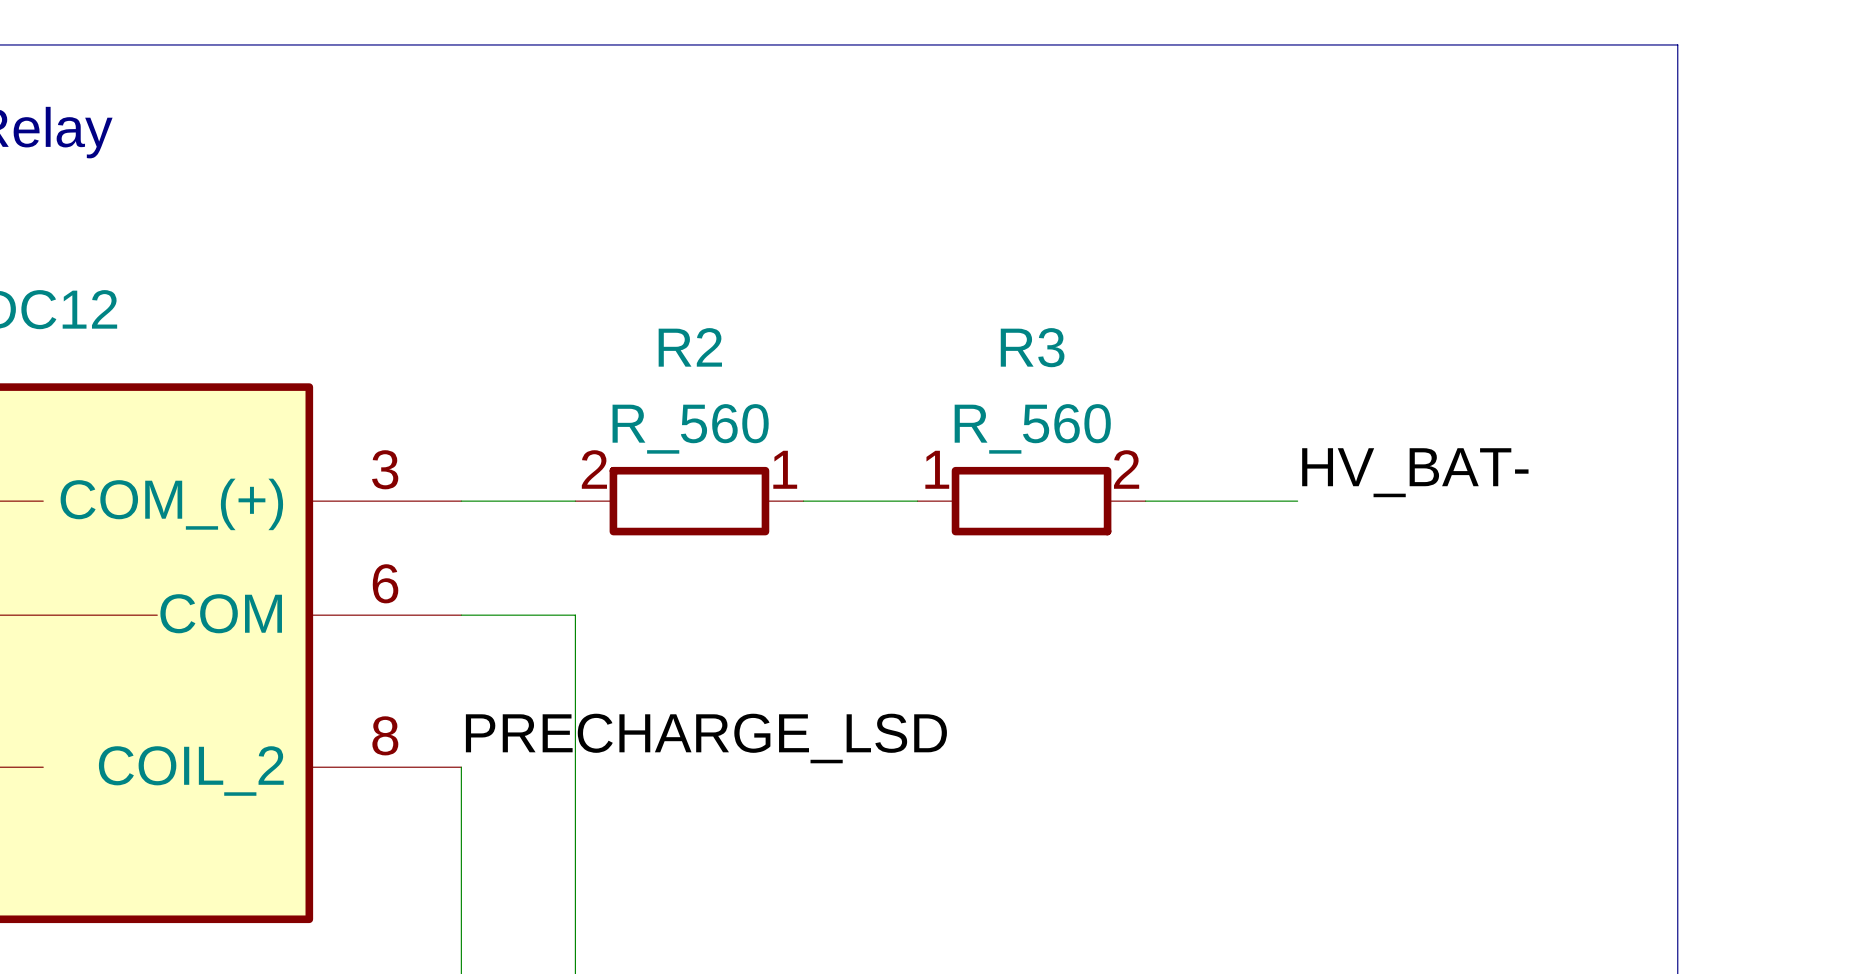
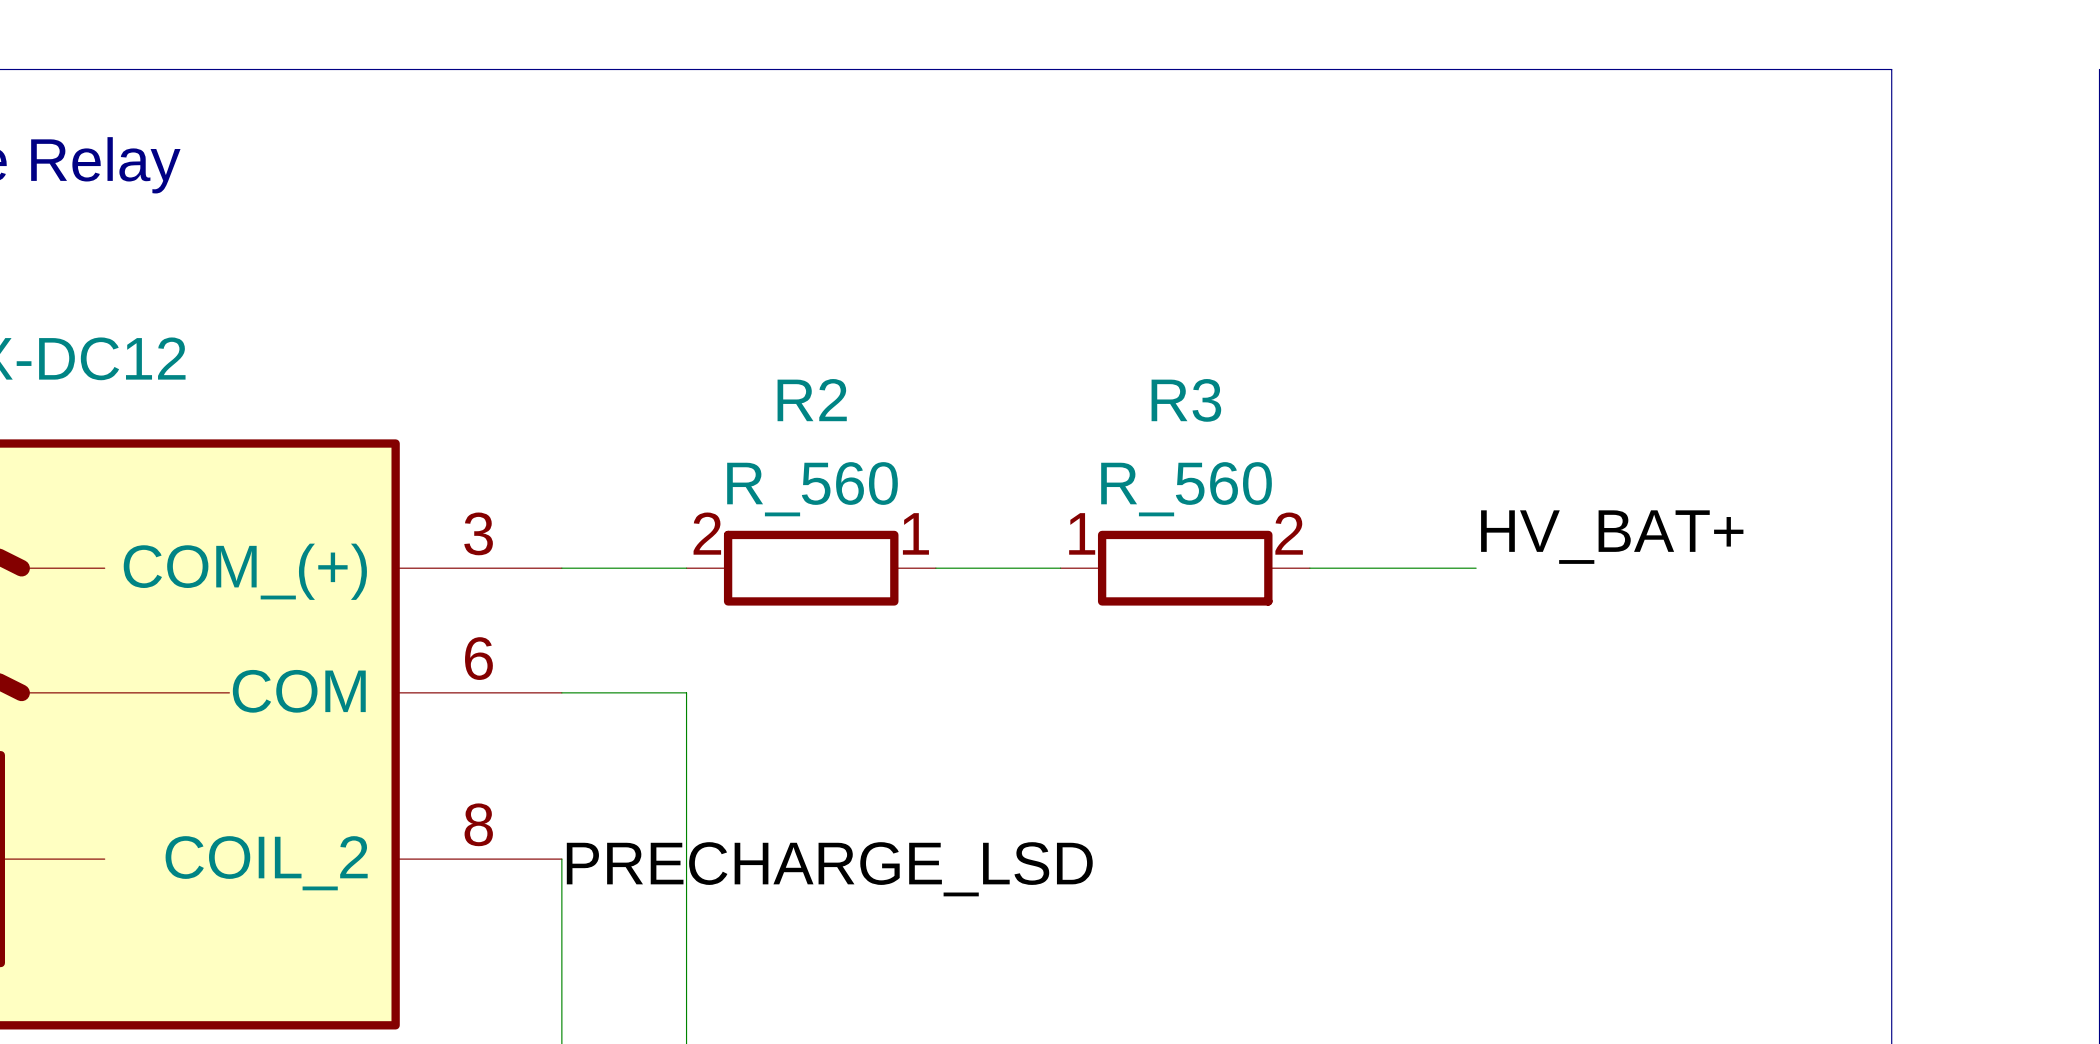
label: HV_BAT- (1415, 472) -> HV_BAT+ (1612, 537)
label position: PRECHARGE_LSD (706, 738) -> PRECHARGE_LSD (829, 869)

